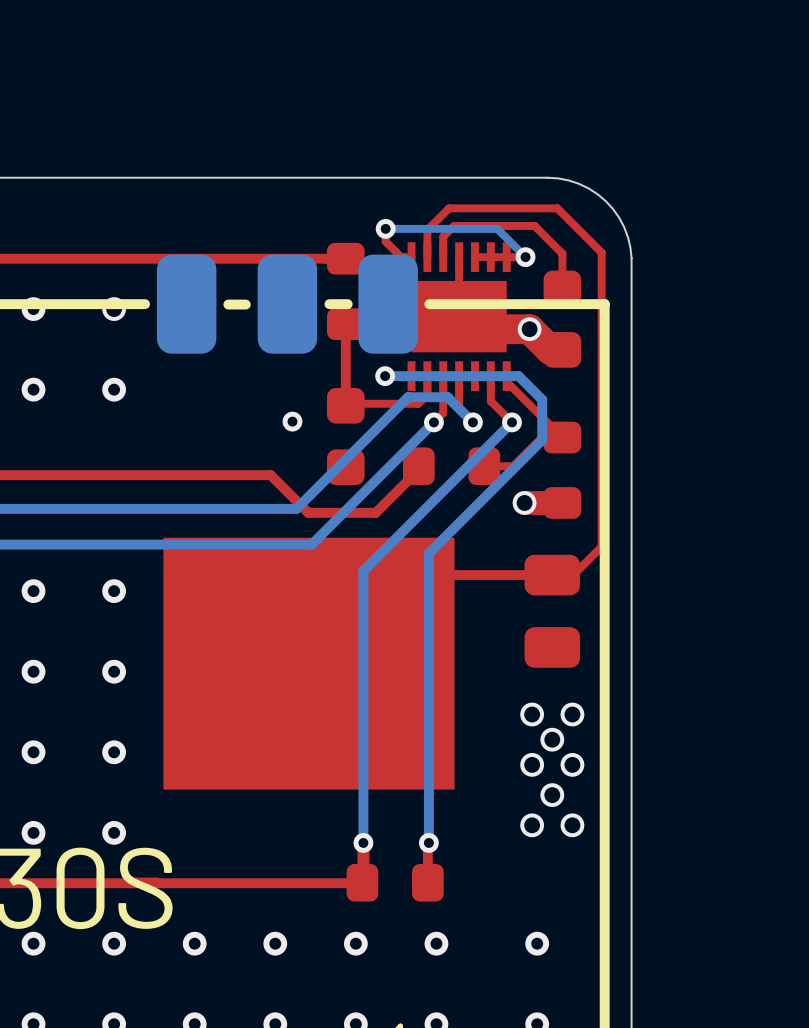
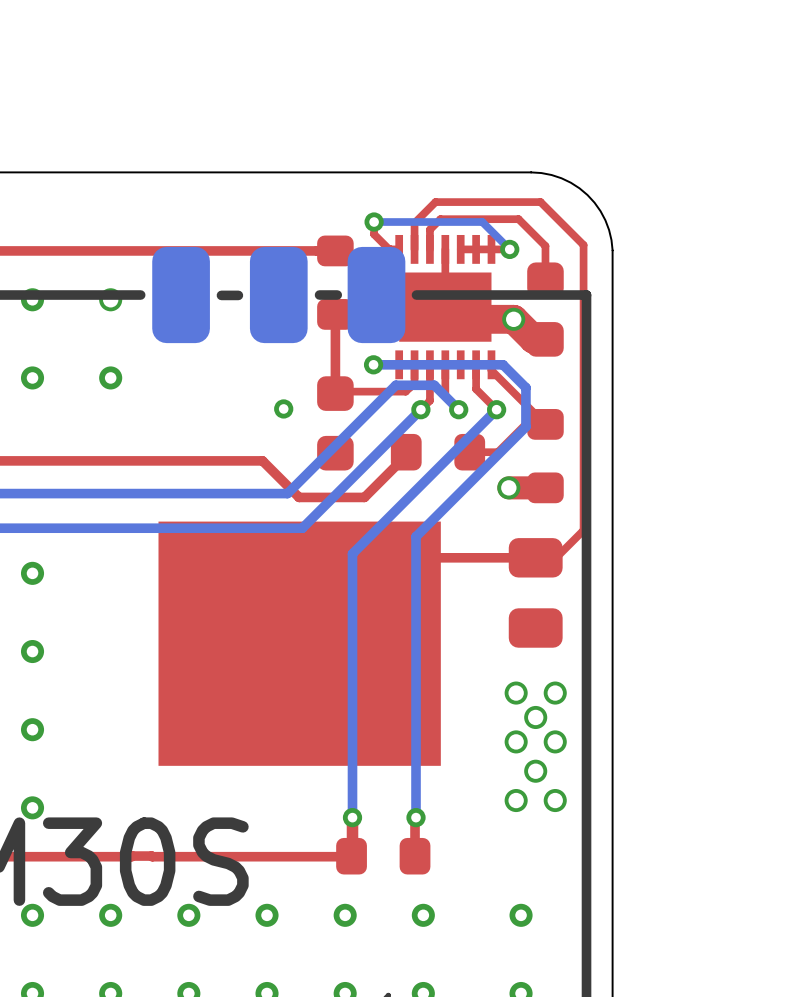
via: (114, 591) -> none
via: (114, 671) -> none
via: (114, 752) -> none
via: (114, 832) -> none

